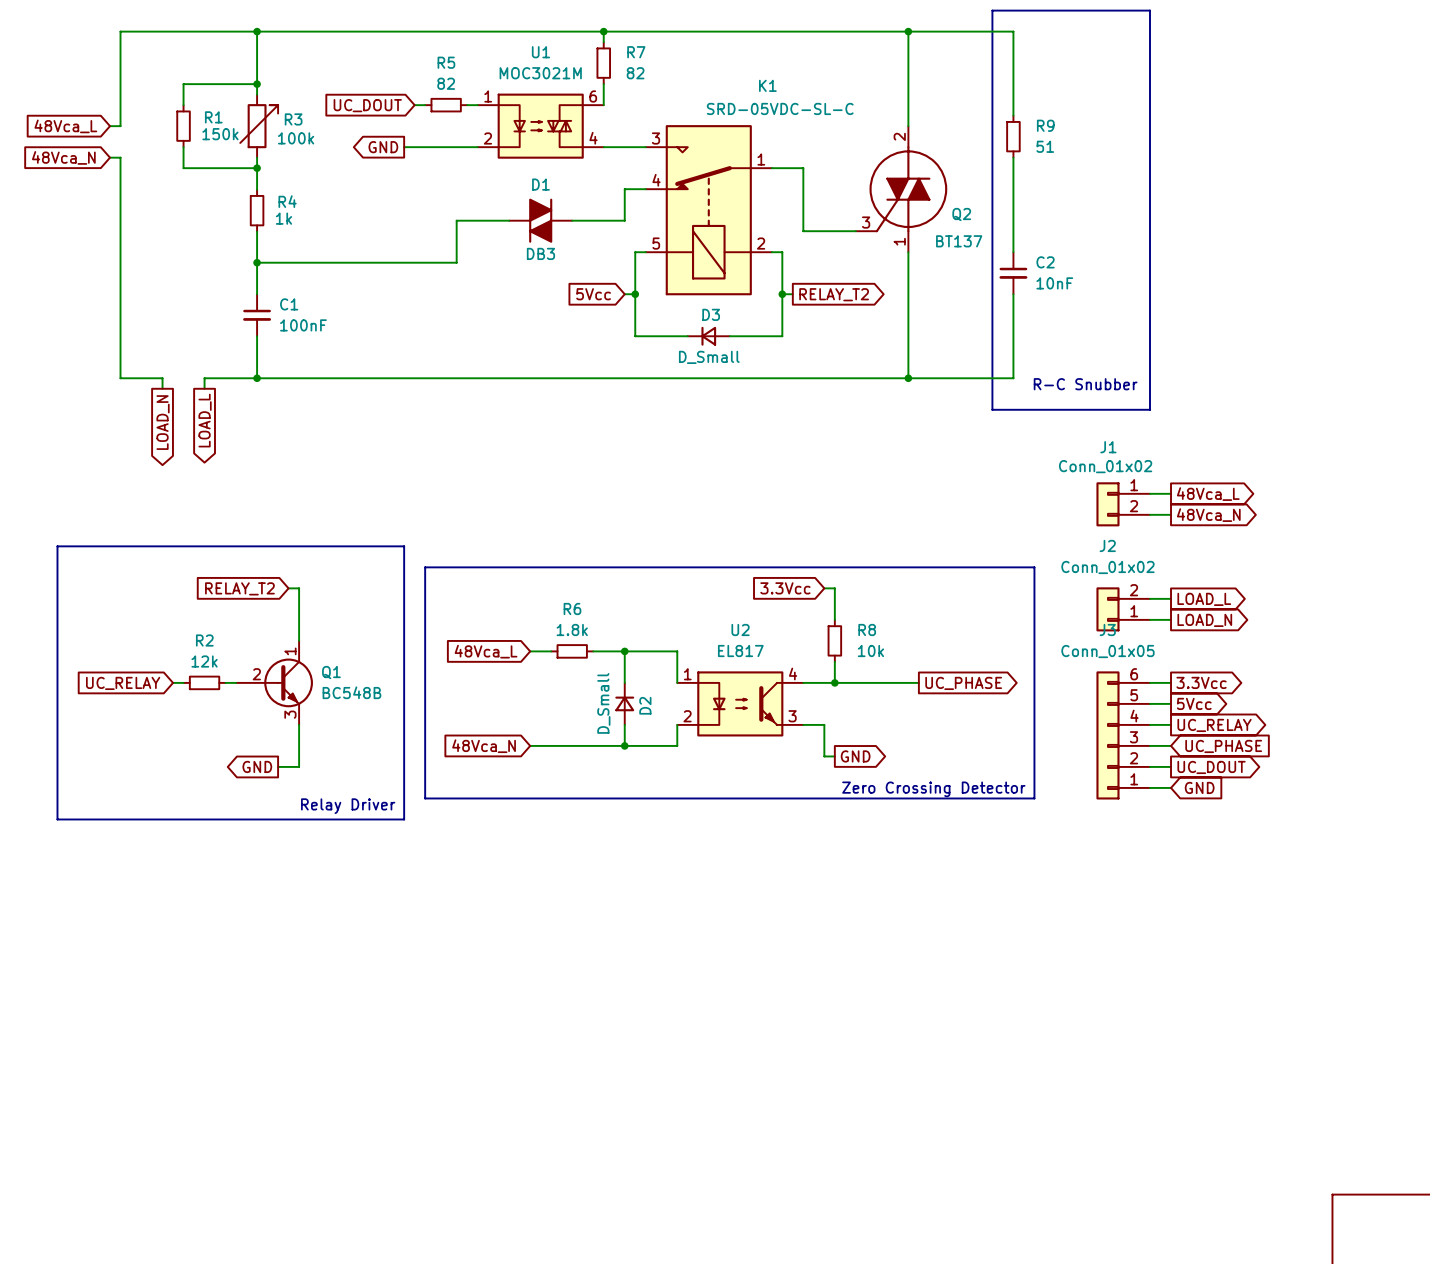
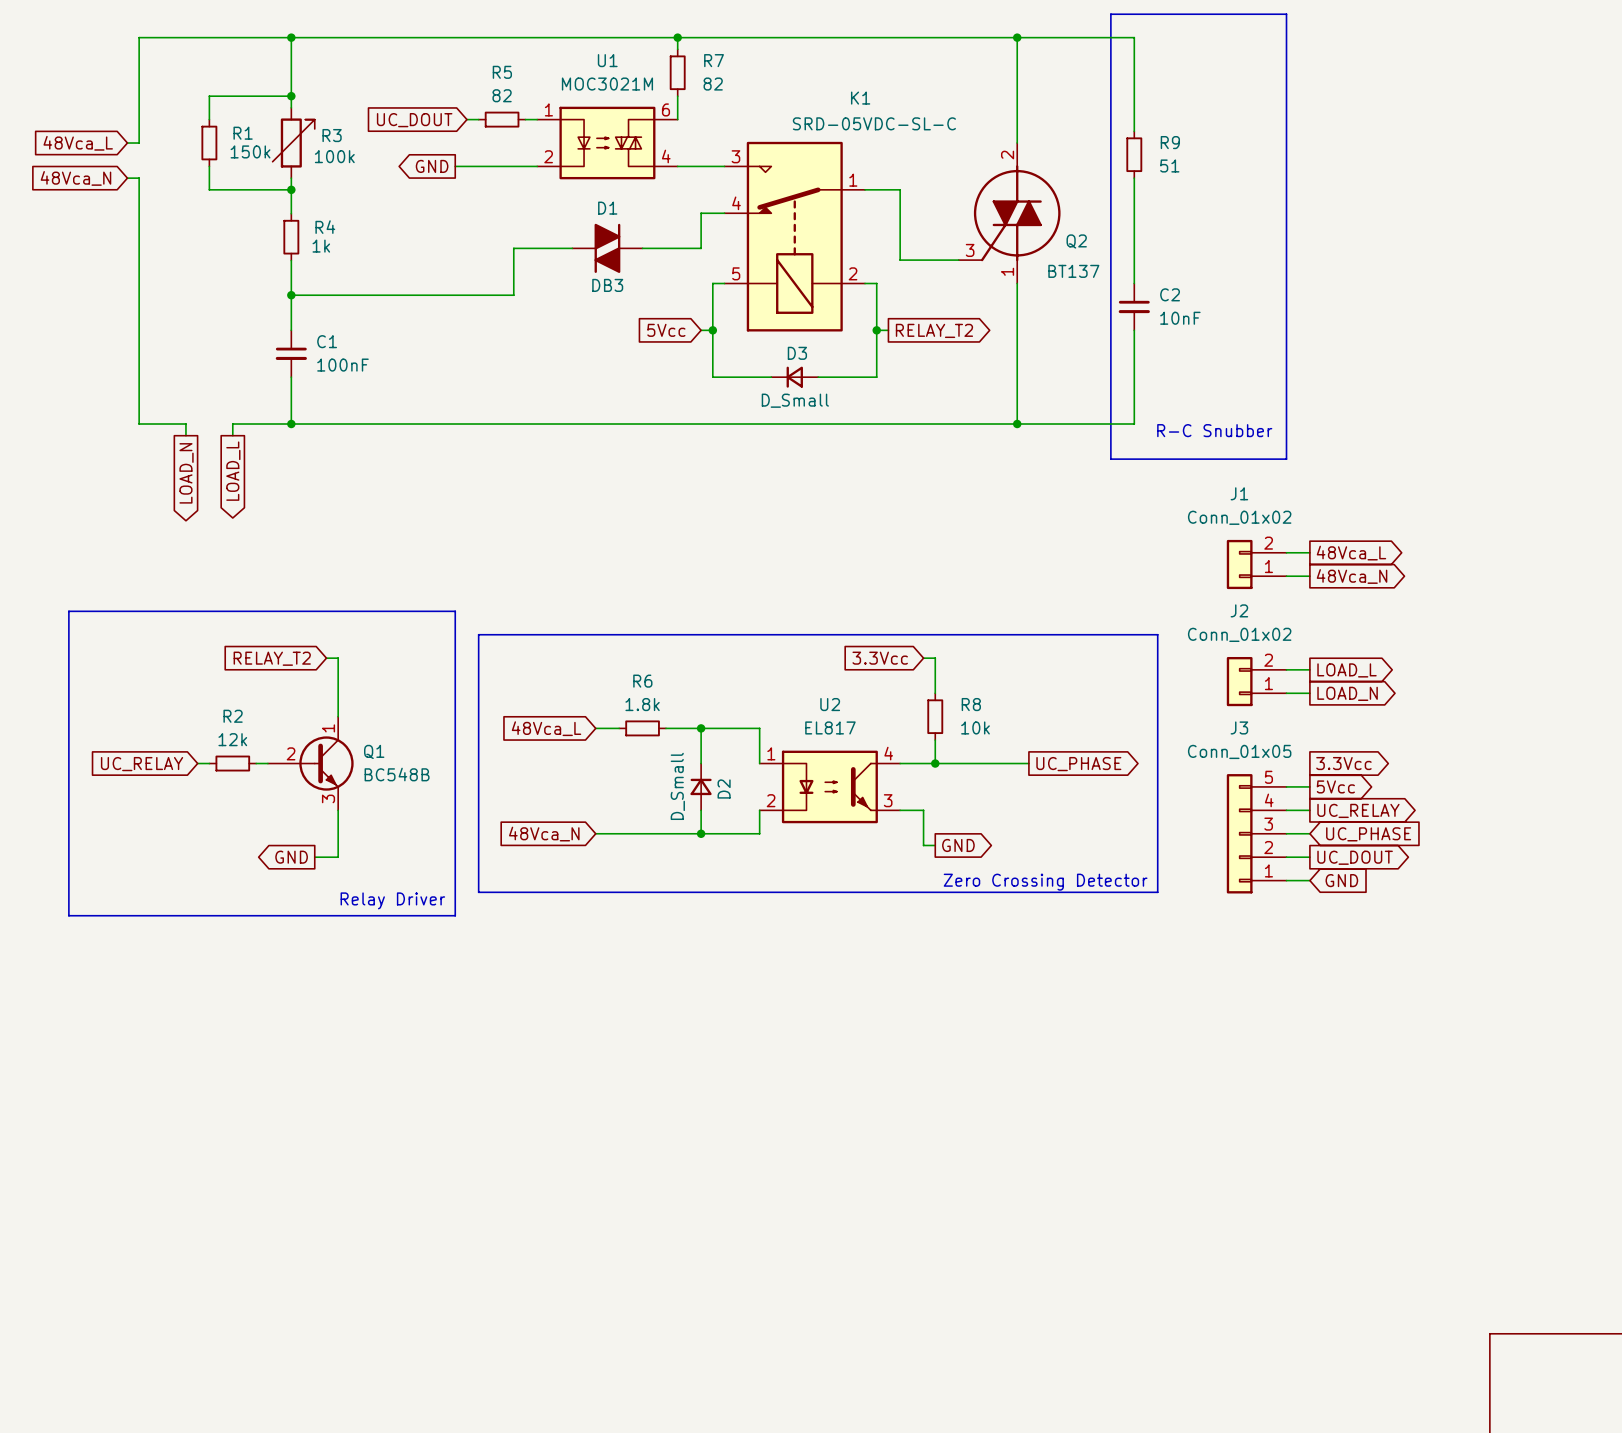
J1 flip: as is (1107, 504) -> up-down (1239, 564)
J3 symbol: [1096, 671, 1150, 800] -> [1226, 774, 1287, 894]
wire: (1149, 682) (1171, 682) -> none

